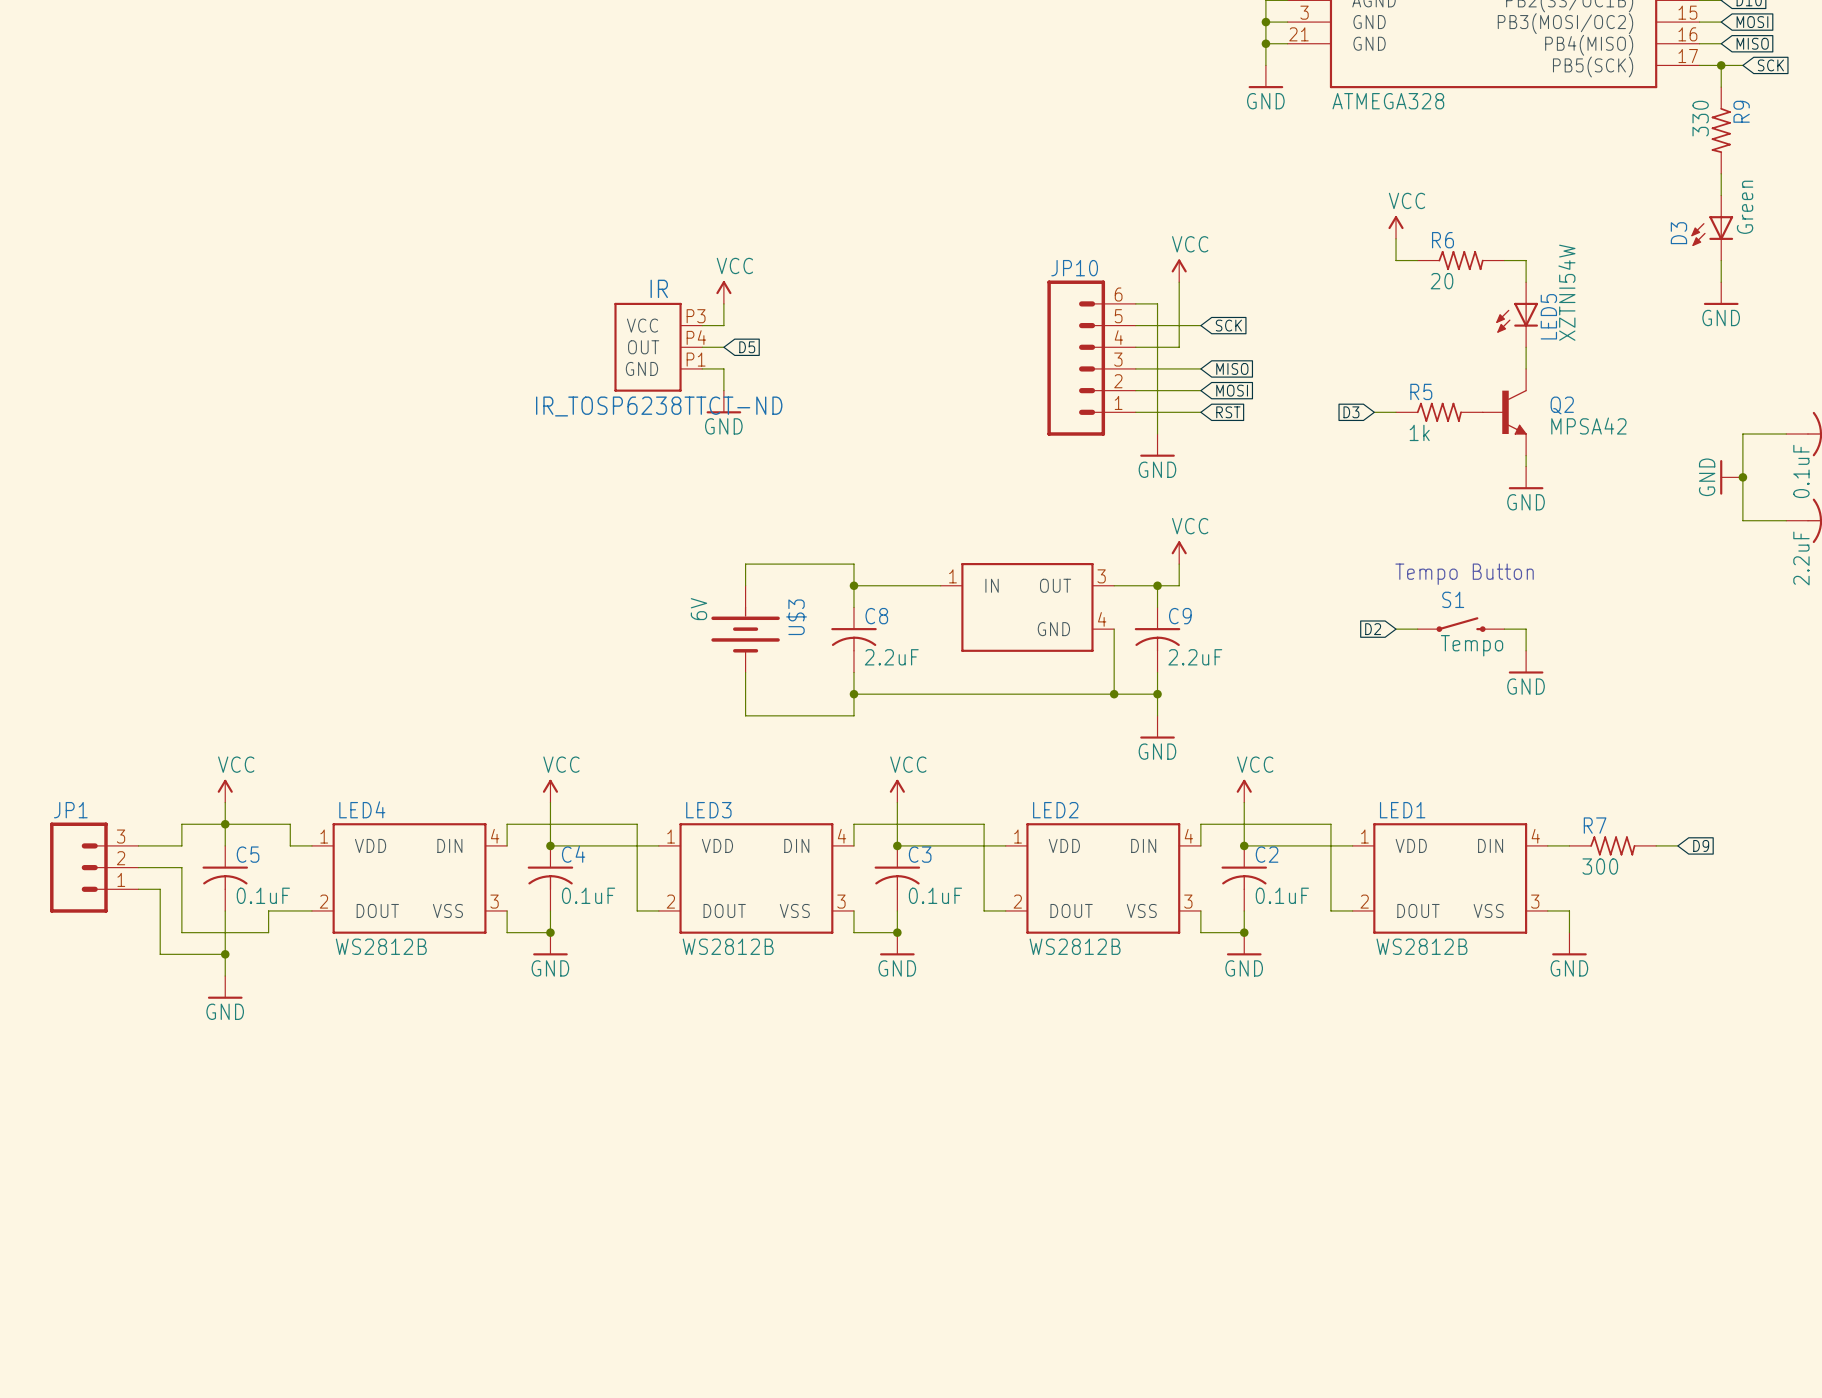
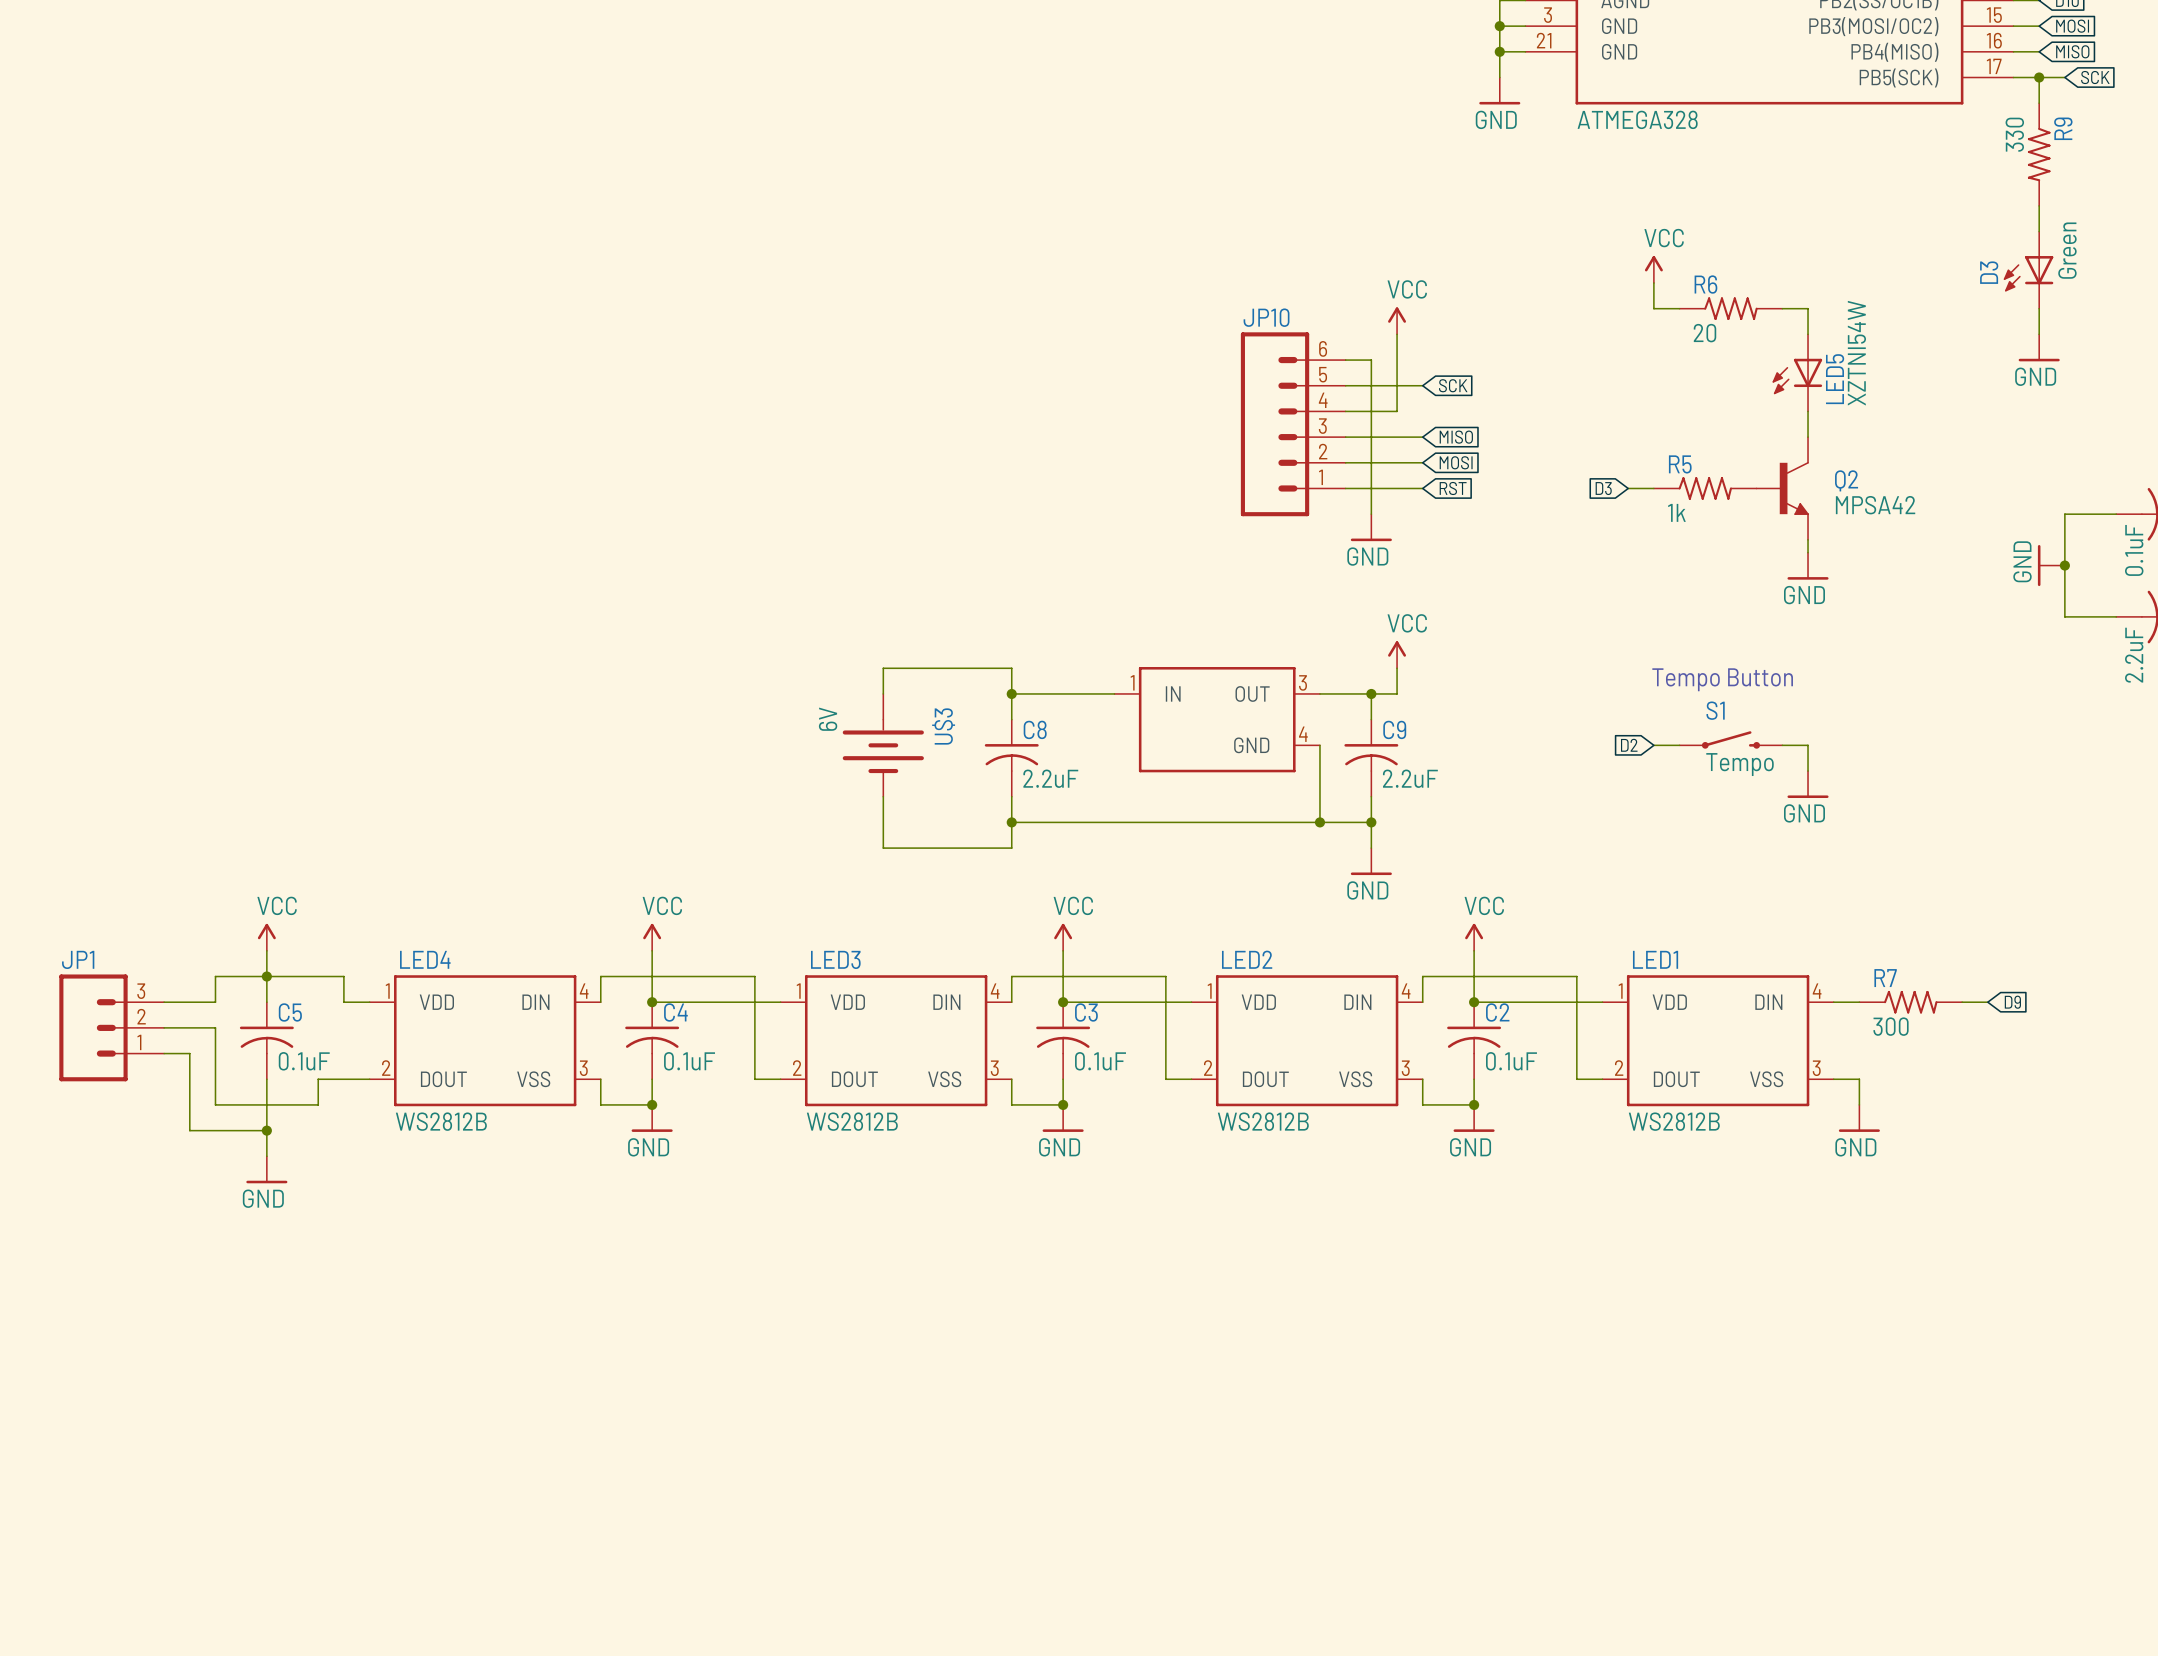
power symbol: VCC (723, 292) -> none
wire: (723, 303) (723, 325) (702, 325) -> none
IR: IR_TOSP6238TTCT-ND (658, 347) -> none
wire: (702, 347) (723, 347) -> none
global label: D5 (747, 347) -> none
wire: (702, 368) (723, 368) (723, 390) -> none
power symbol: GND (723, 402) -> none

